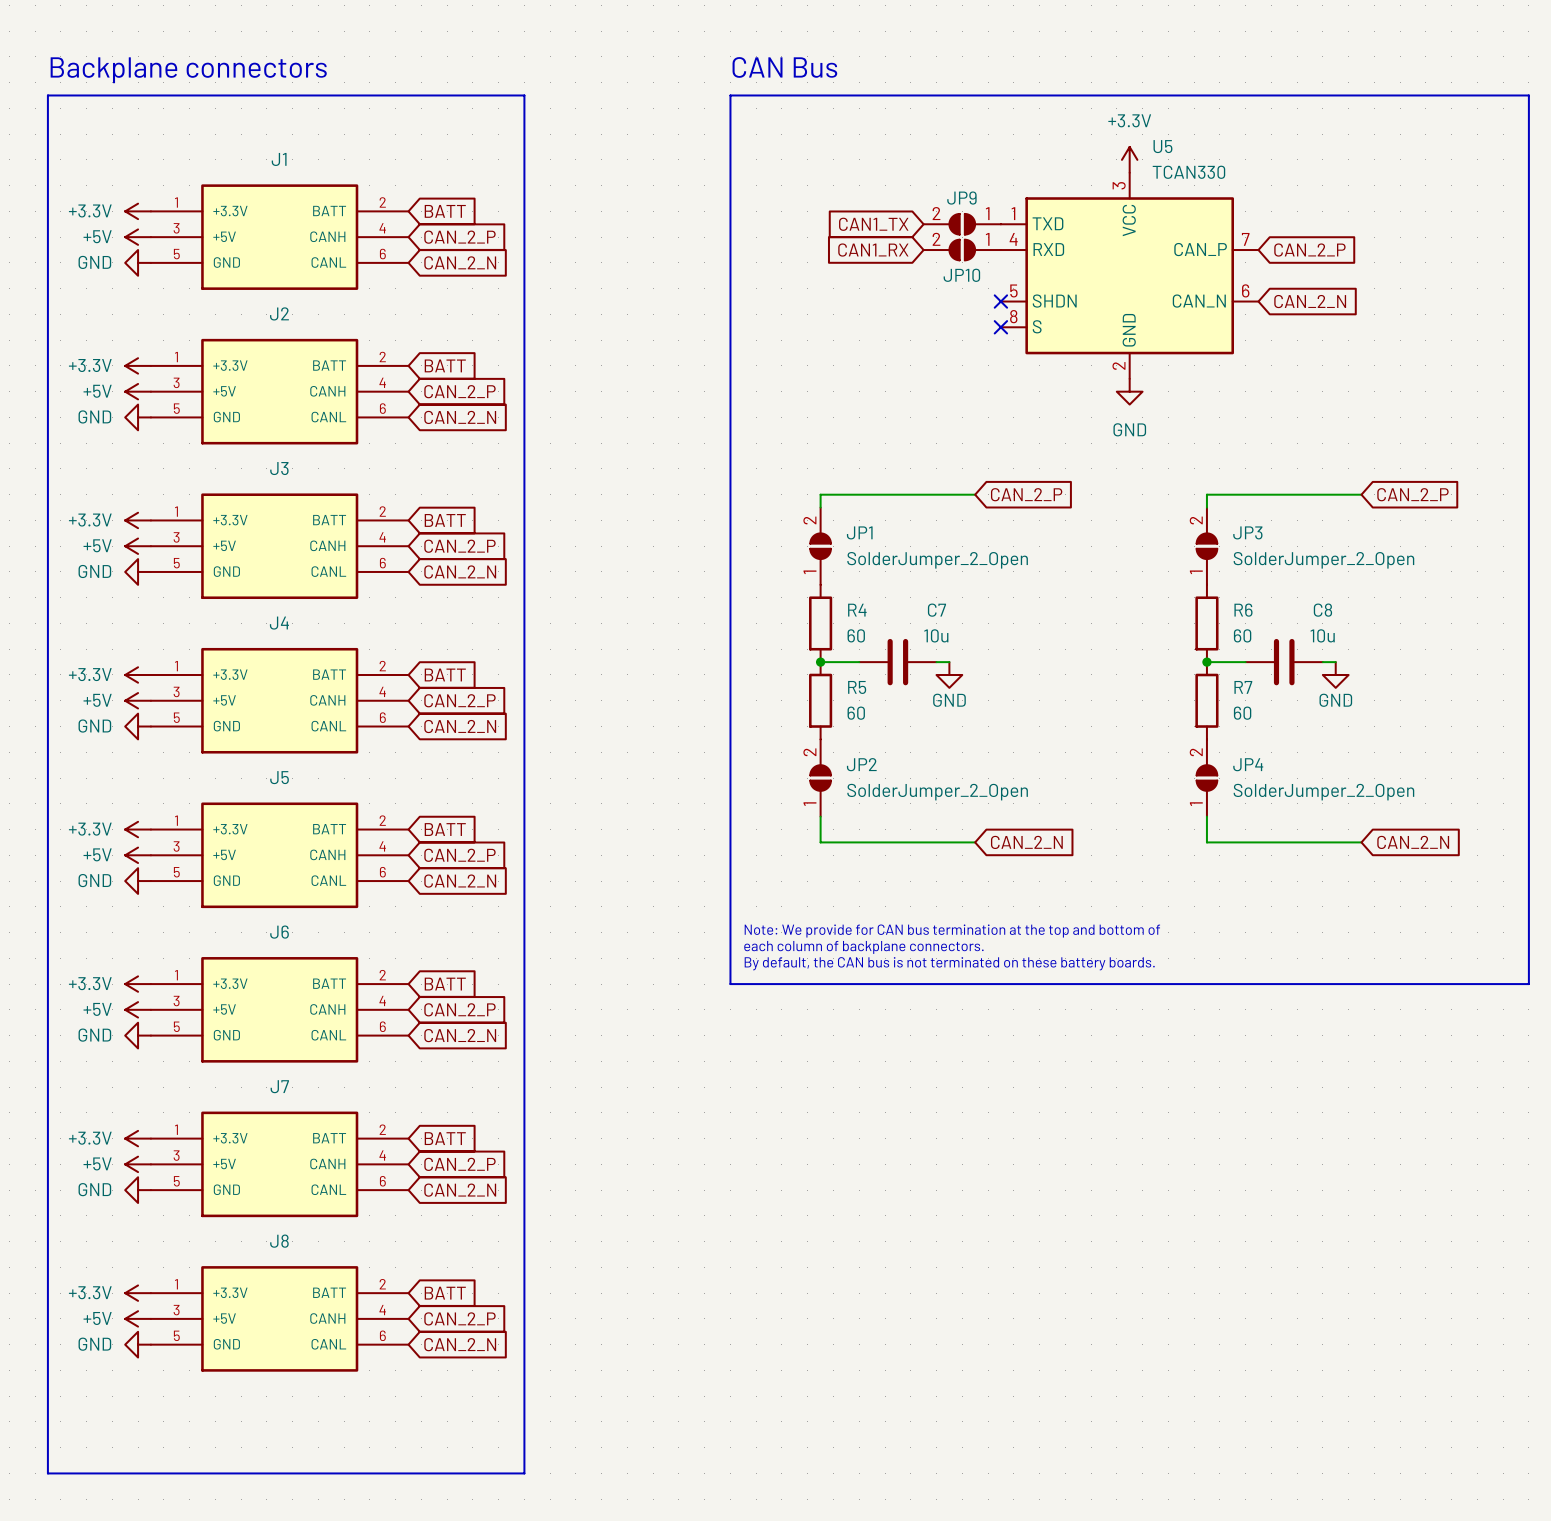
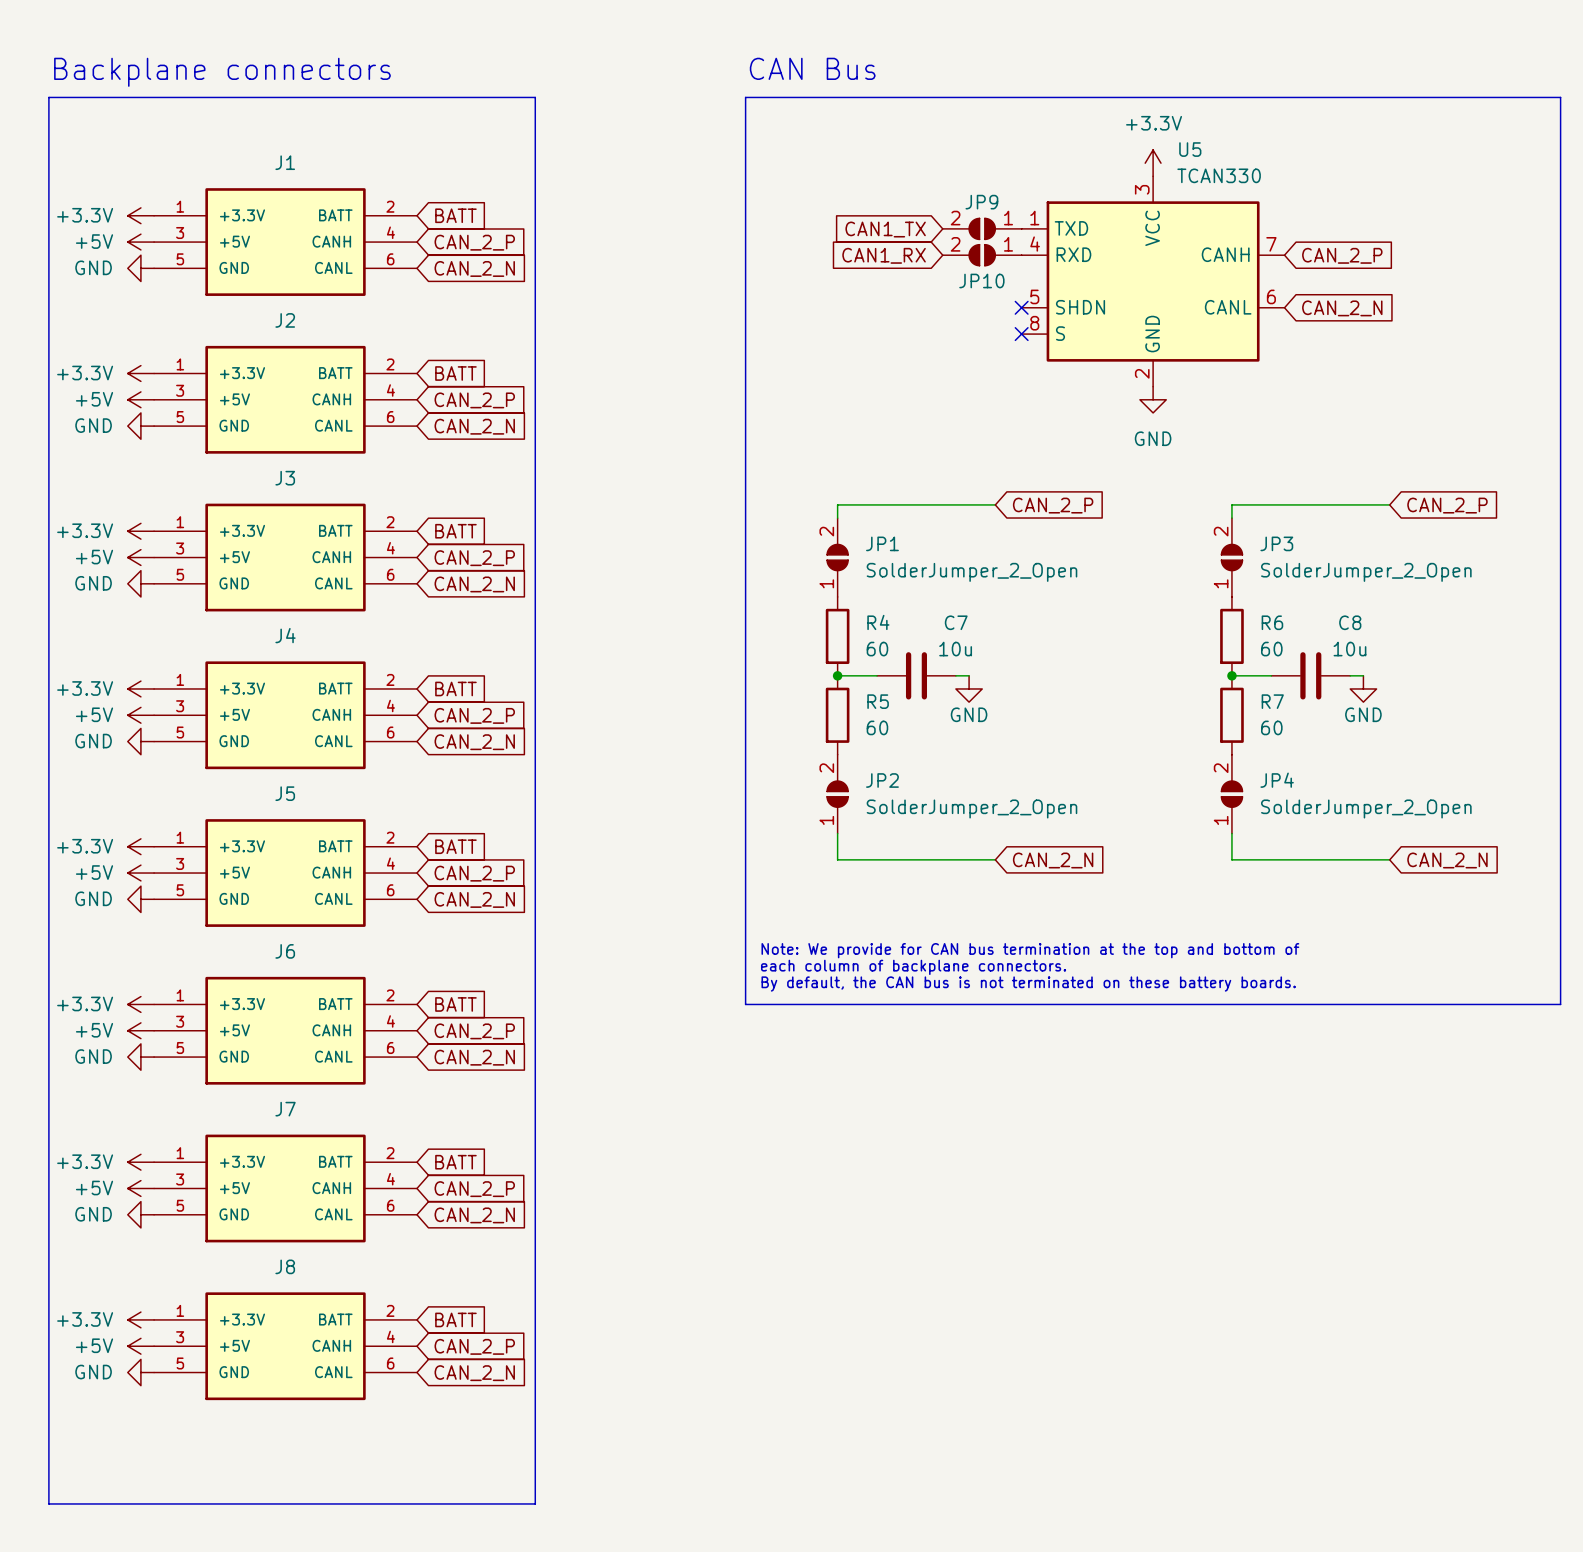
U5 pin name: CAN_P (1200, 249) -> CANH (1225, 254)
U5 pin name: CAN_N (1199, 301) -> CANL (1228, 307)

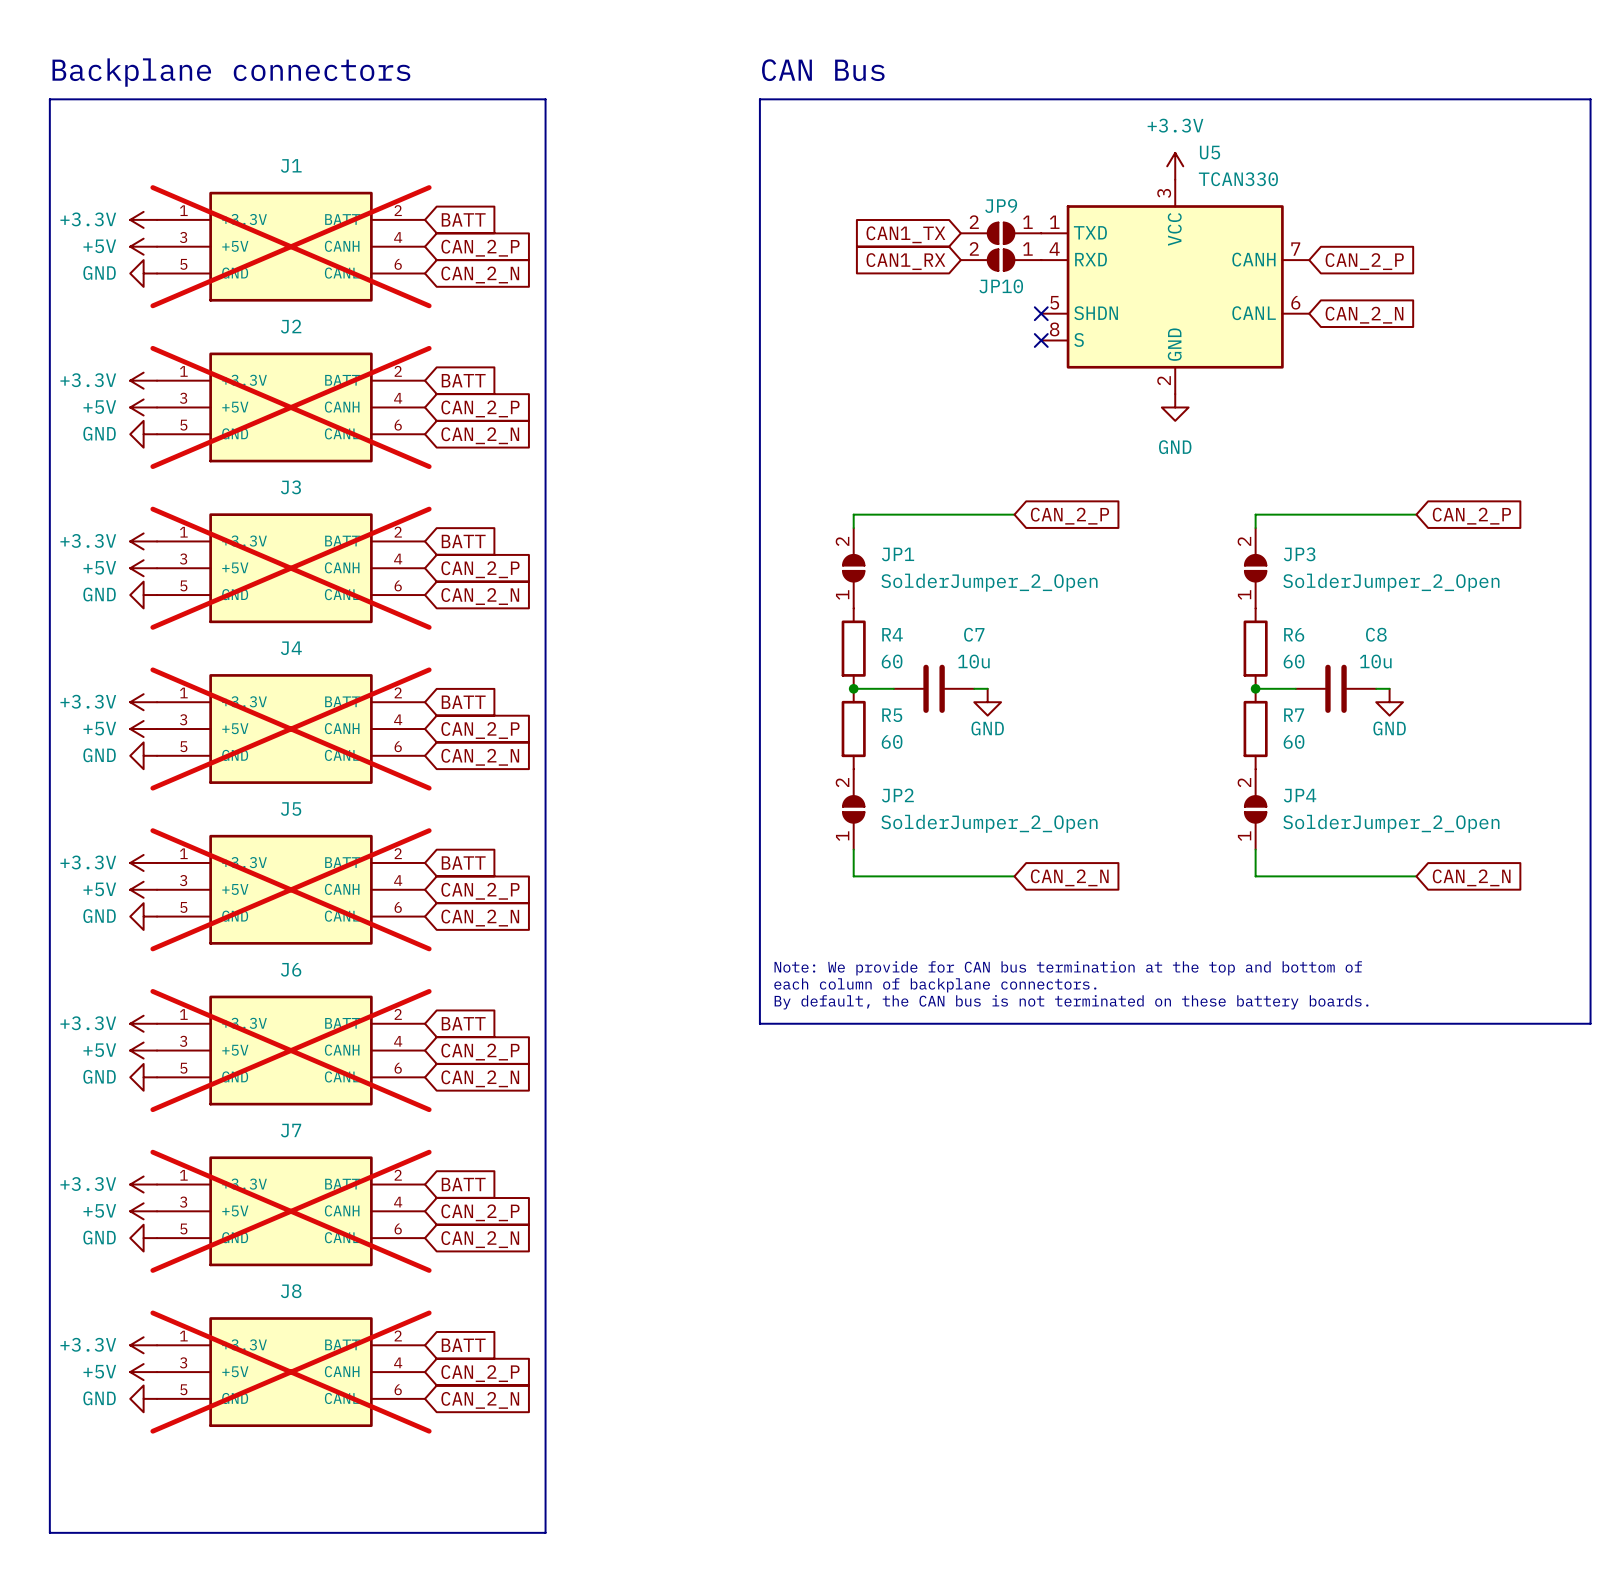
J1 do-not-place cross: none -> (291, 246)
J2 do-not-place cross: none -> (291, 407)
J3 do-not-place cross: none -> (291, 568)
J4 do-not-place cross: none -> (291, 729)
J5 do-not-place cross: none -> (291, 889)
J6 do-not-place cross: none -> (291, 1050)
J7 do-not-place cross: none -> (291, 1211)
J8 do-not-place cross: none -> (291, 1372)

